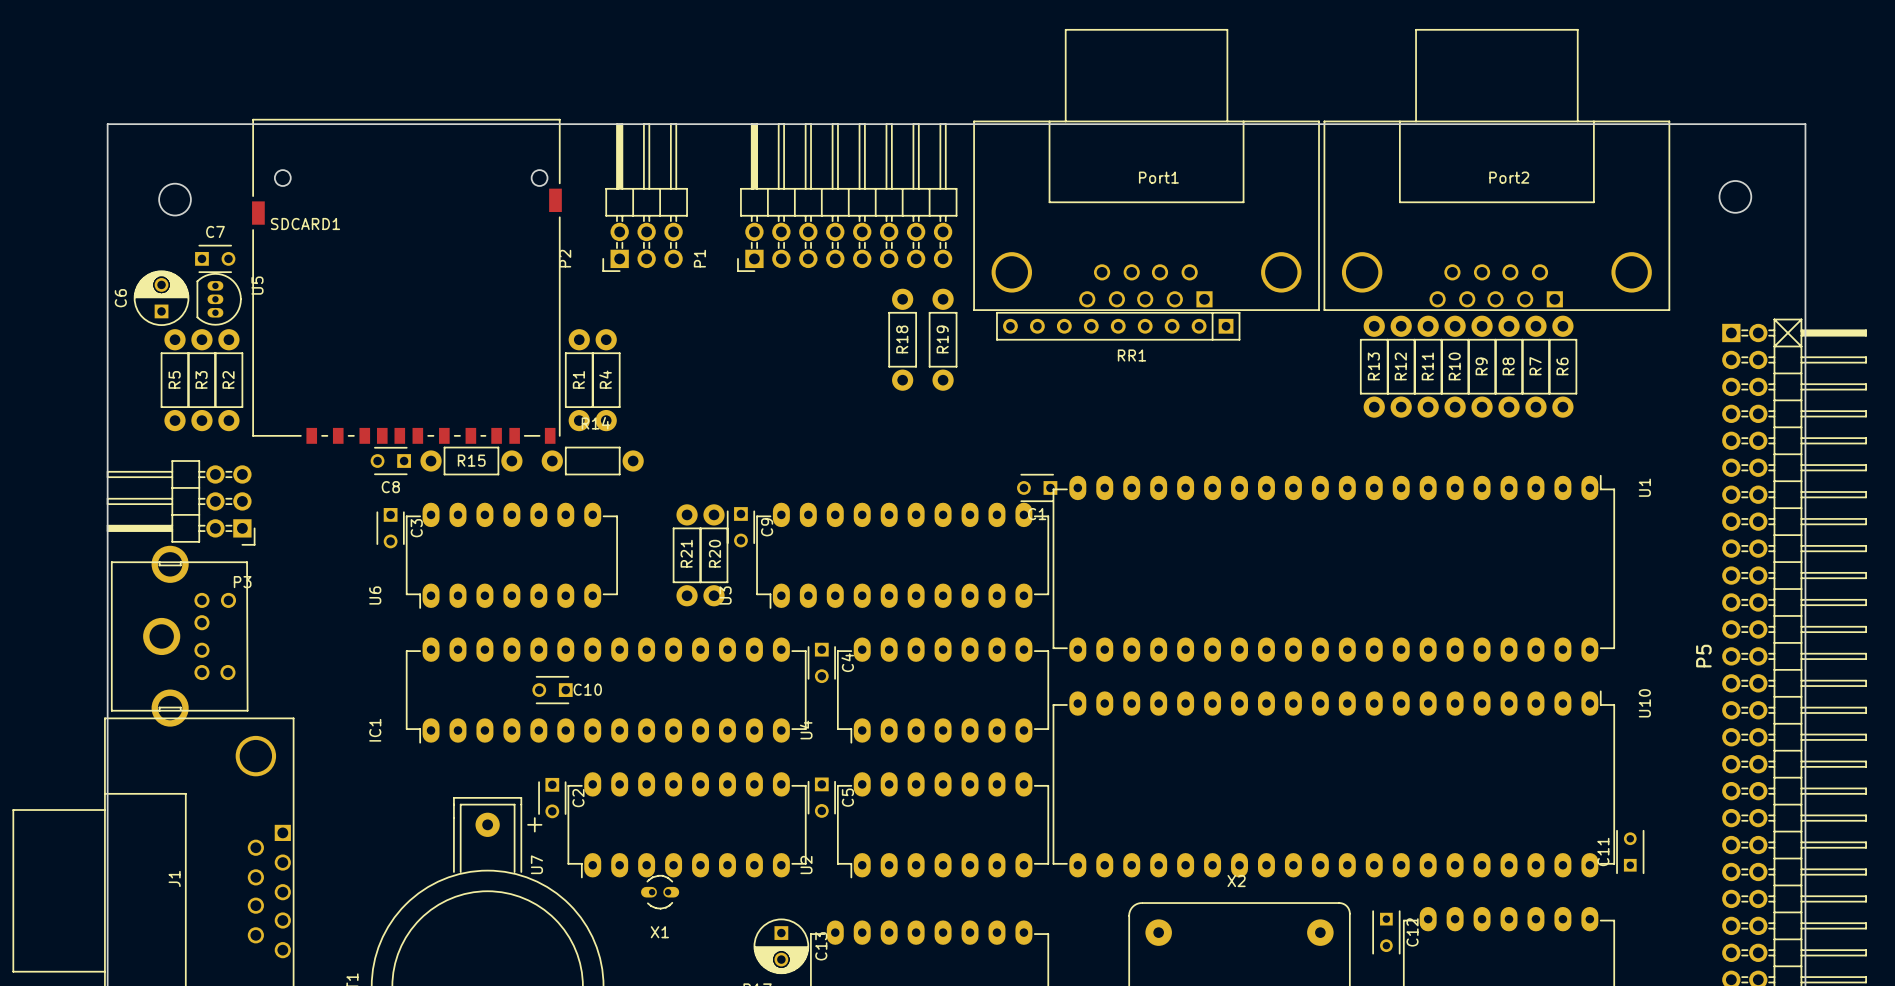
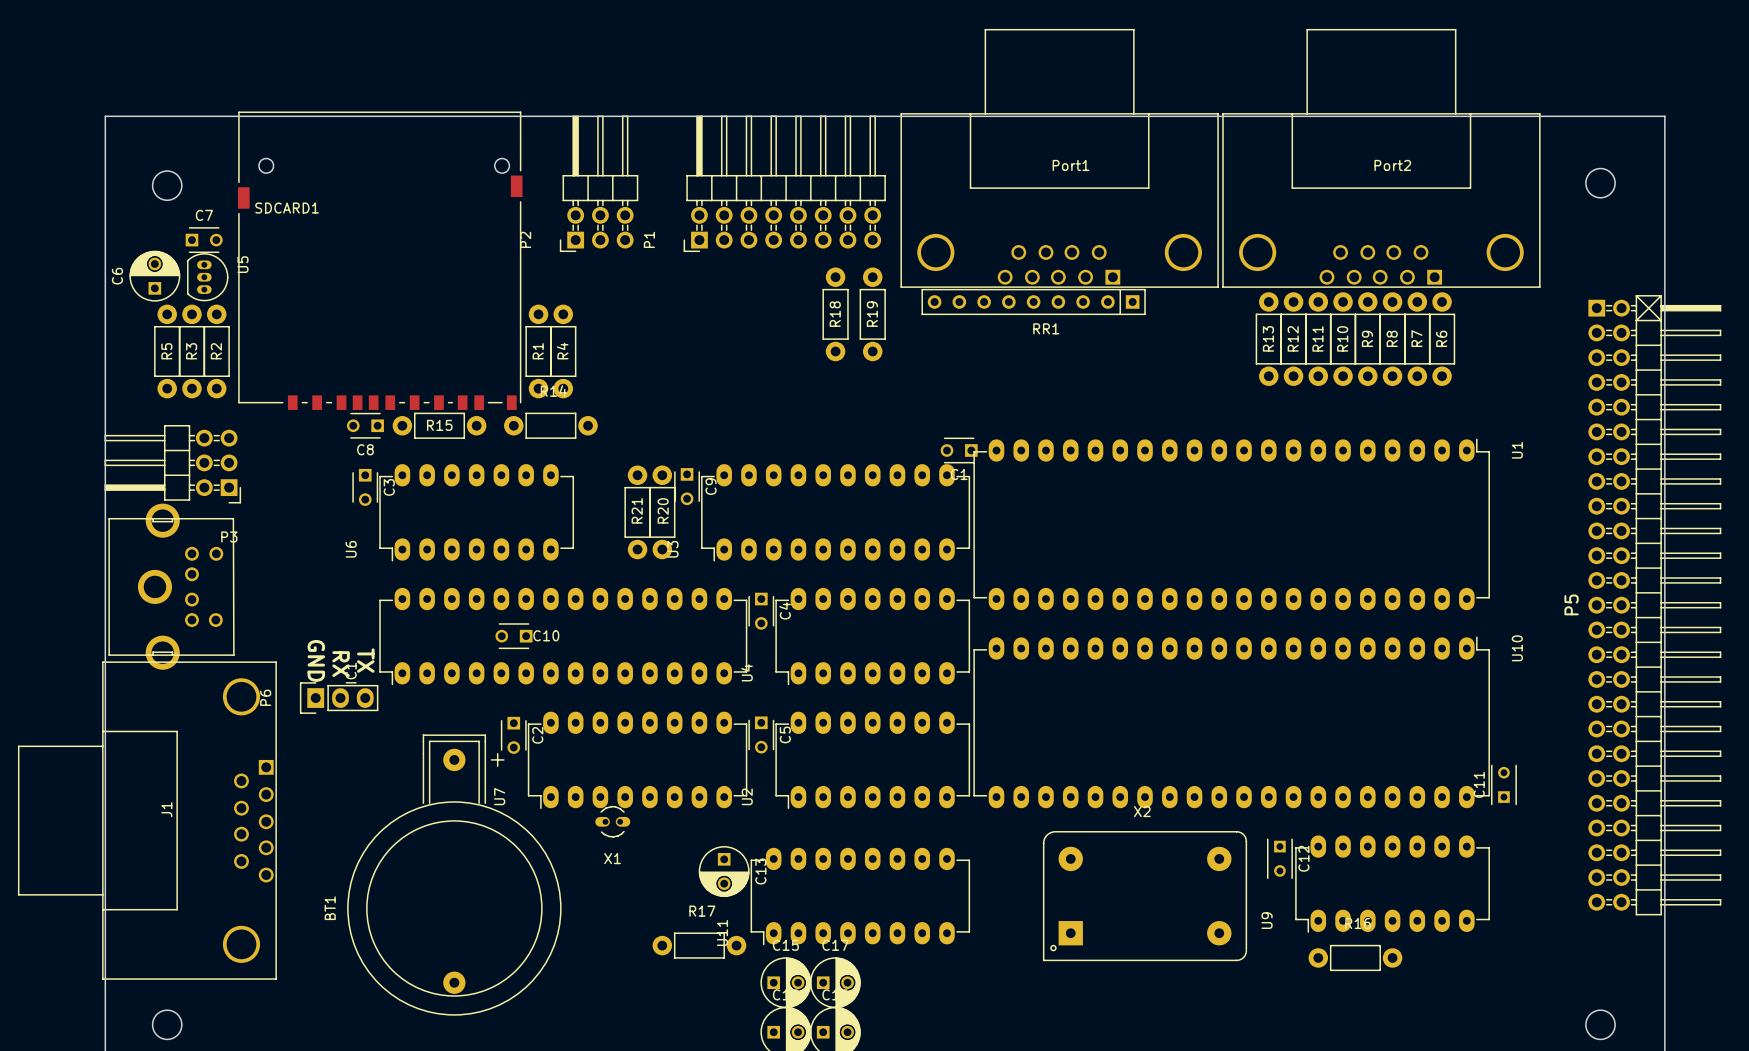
text: none -> TX (365, 660)
text: none -> GND (316, 660)
text: none -> RX (341, 664)
P6: none -> (339, 698)

